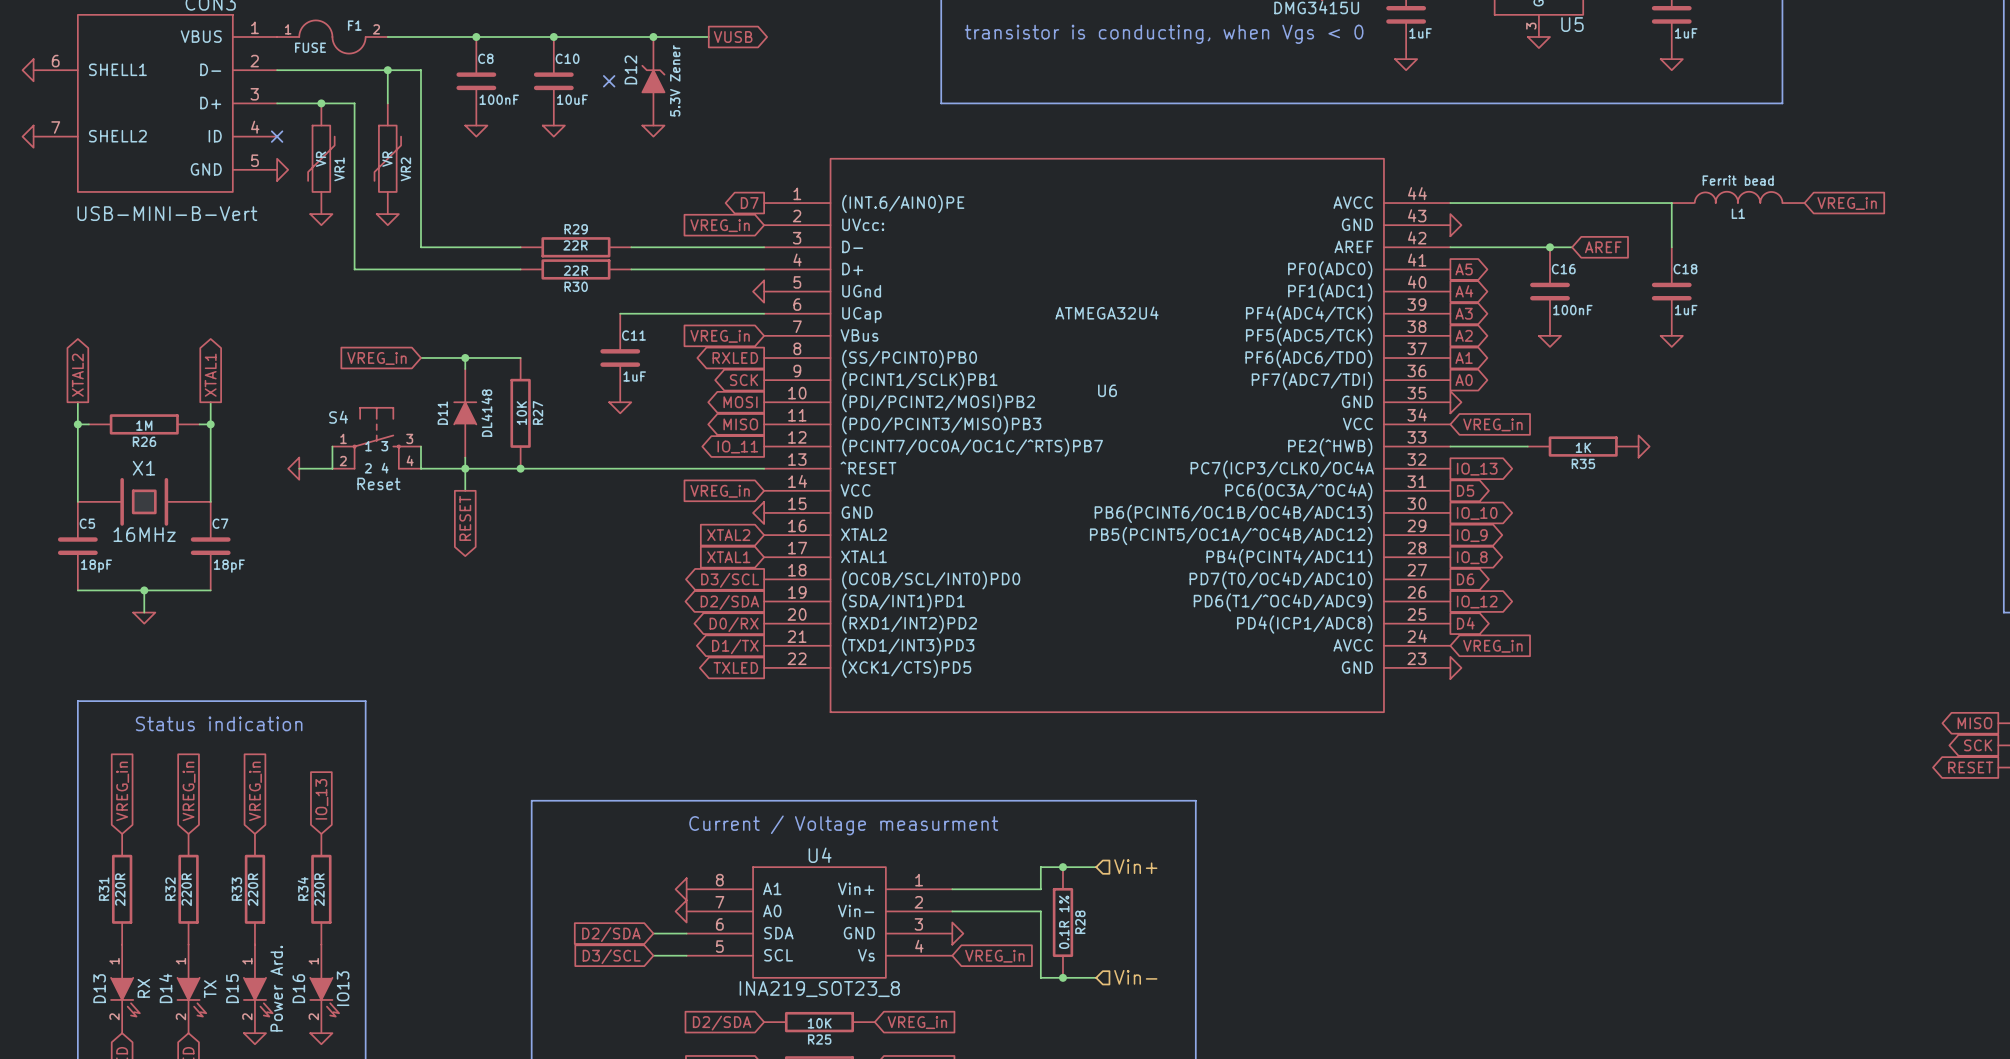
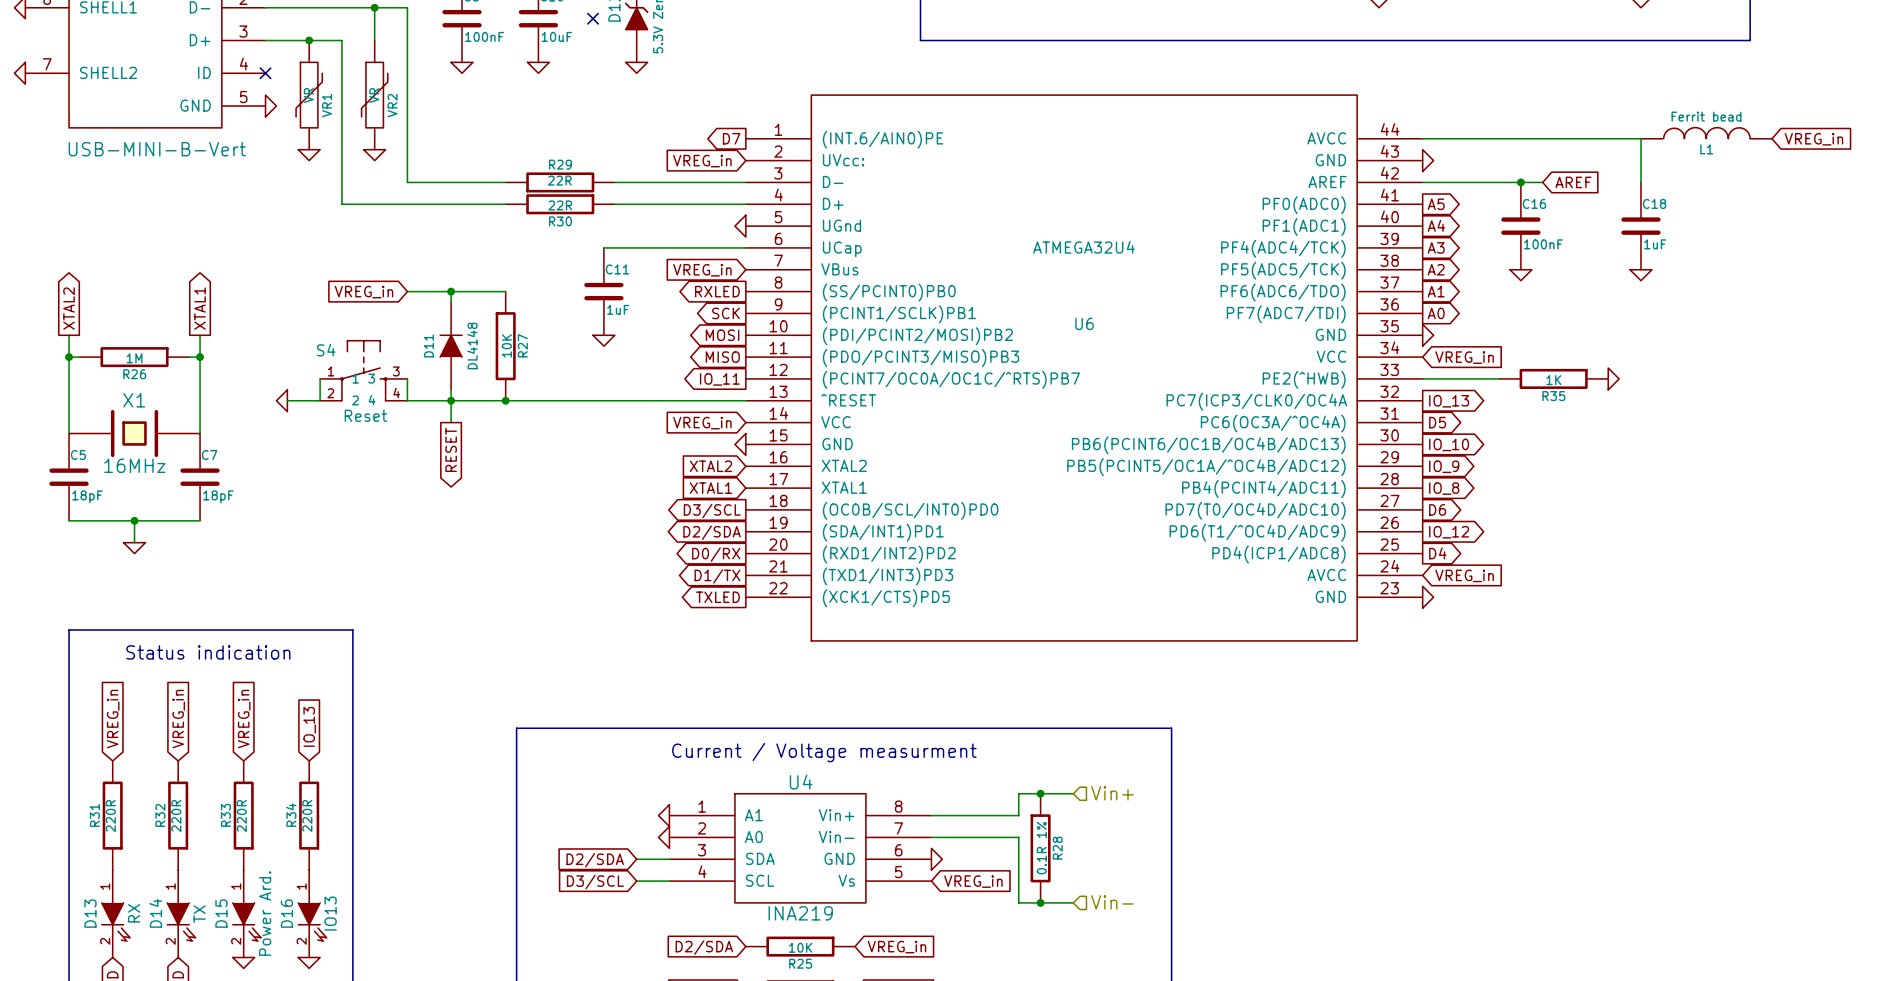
U4 pin number: 8 (719, 880) -> 1 (702, 806)
U4 pin number: 1 (919, 880) -> 8 (898, 806)
U4 pin number: 7 (719, 902) -> 2 (701, 828)
U4 pin number: 2 (918, 902) -> 7 (898, 828)
U4 pin number: 6 (719, 924) -> 3 (701, 850)
U4 pin number: 3 (918, 924) -> 6 (898, 850)
U4 pin number: 5 (719, 946) -> 4 (702, 871)
U4 pin number: 4 (919, 946) -> 5 (898, 872)
U4 value: INA219_SOT23_8 (819, 989) -> INA219 (800, 913)

